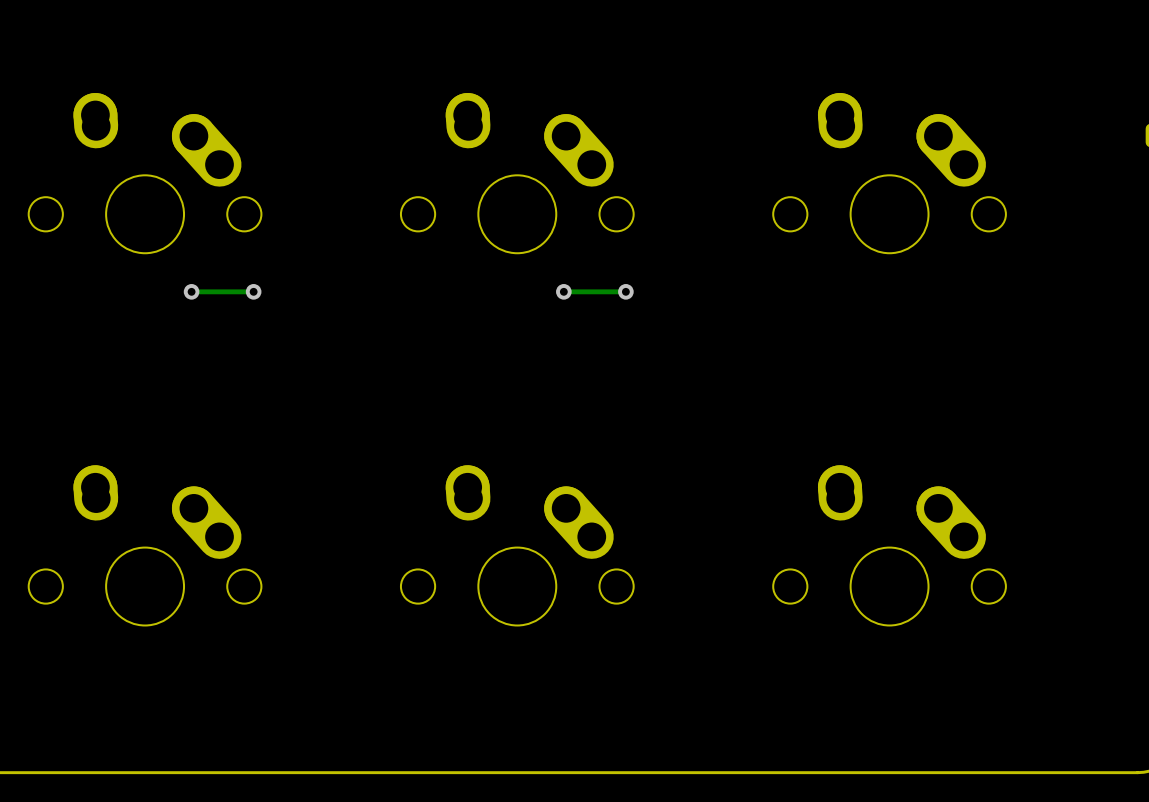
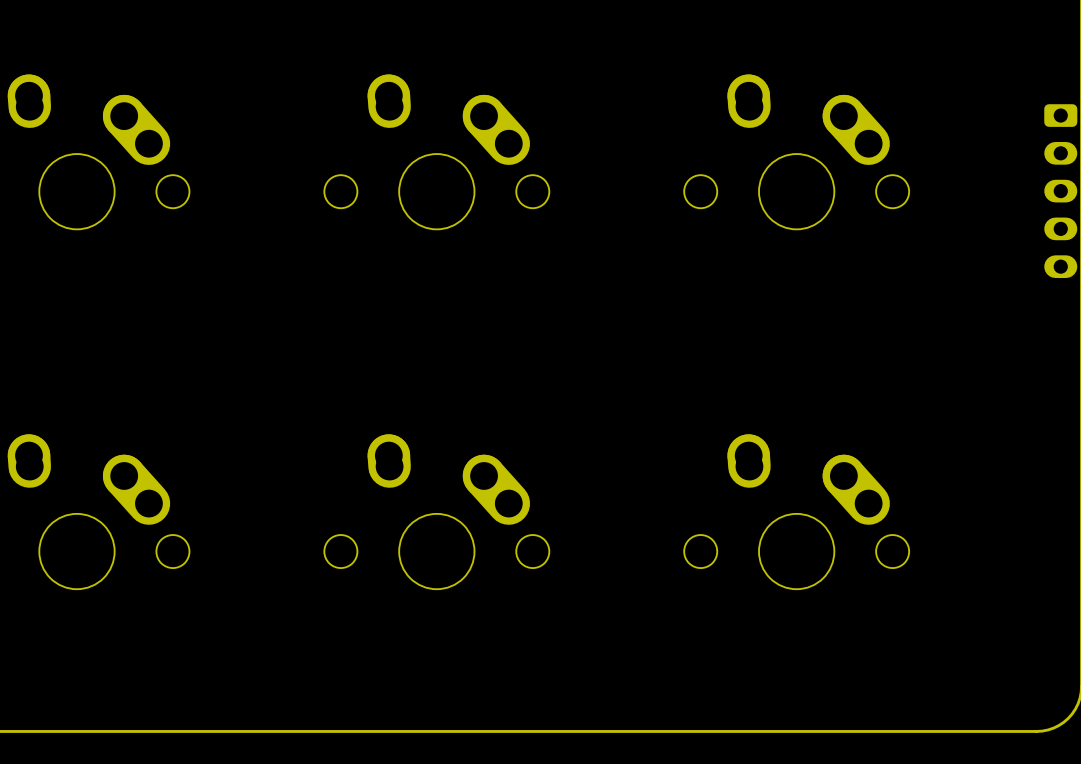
via: (191, 291) -> none
track: (253, 291) (191, 291) -> none
via: (253, 291) -> none
via: (563, 291) -> none
track: (625, 291) (563, 291) -> none
via: (625, 291) -> none

